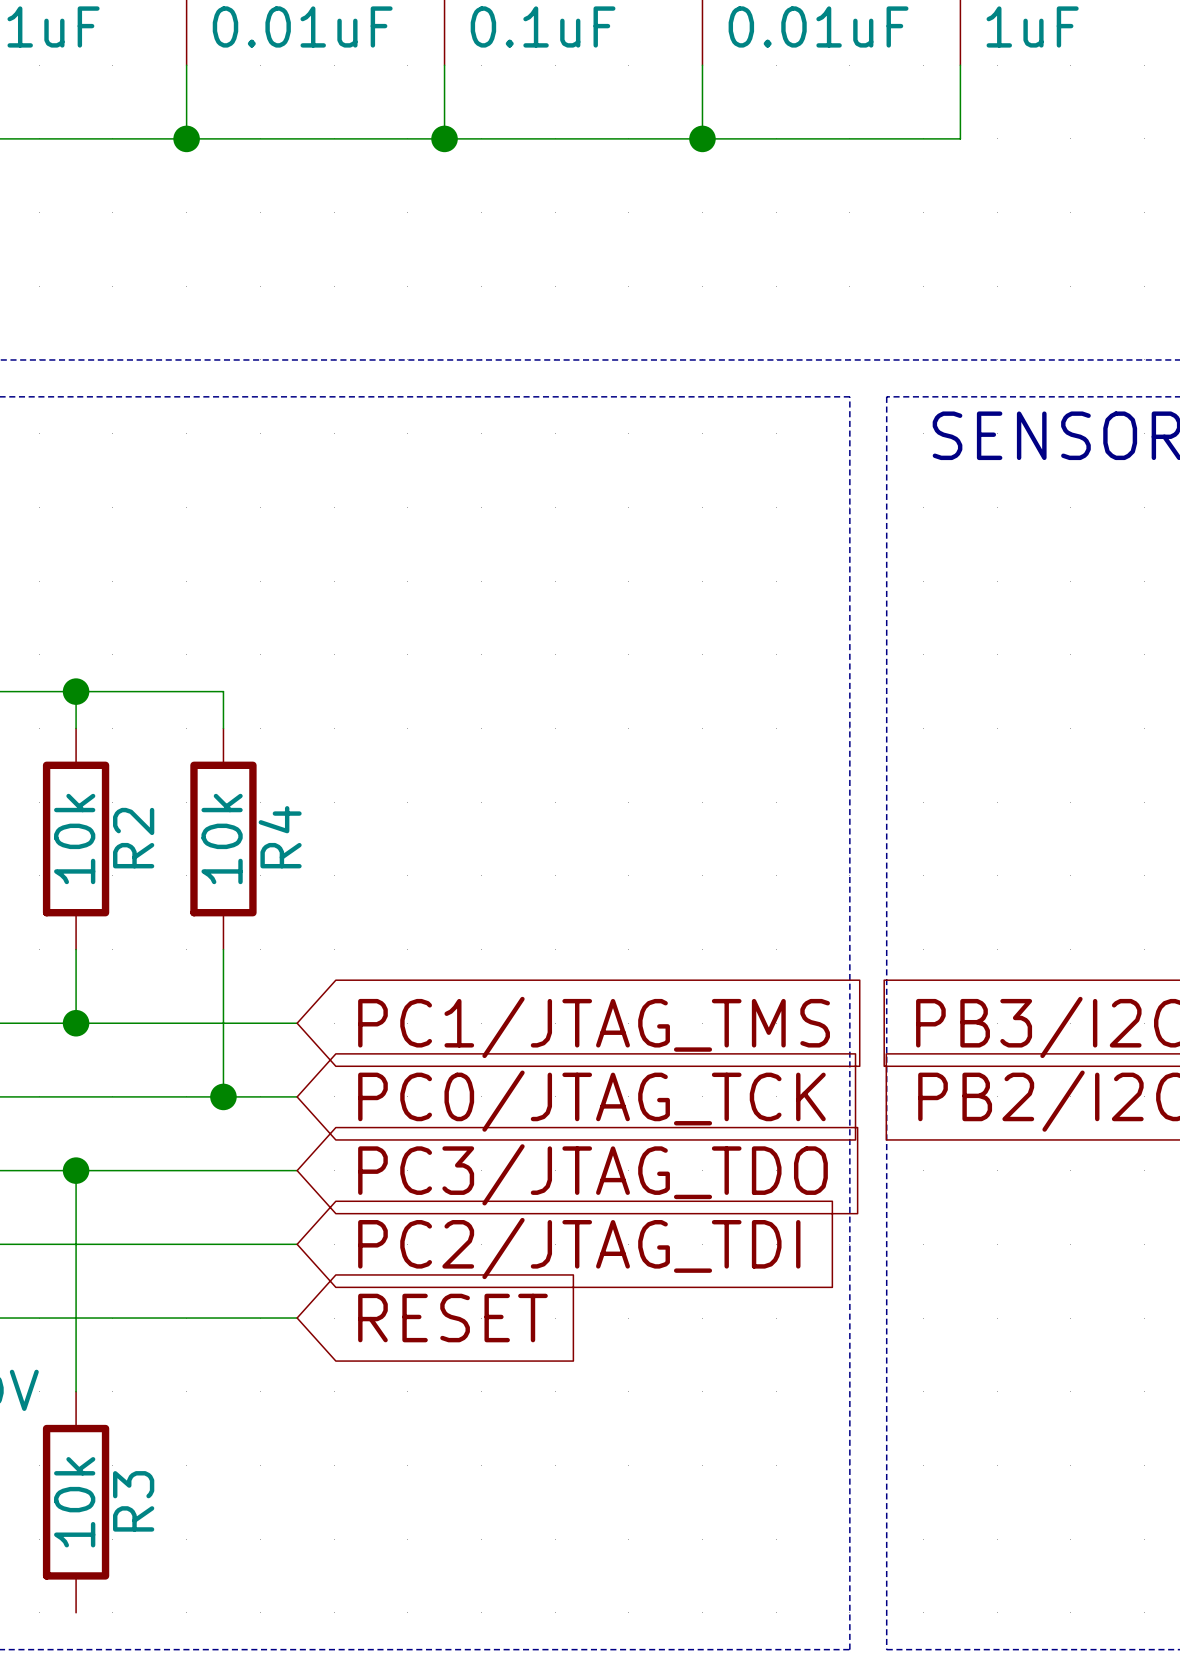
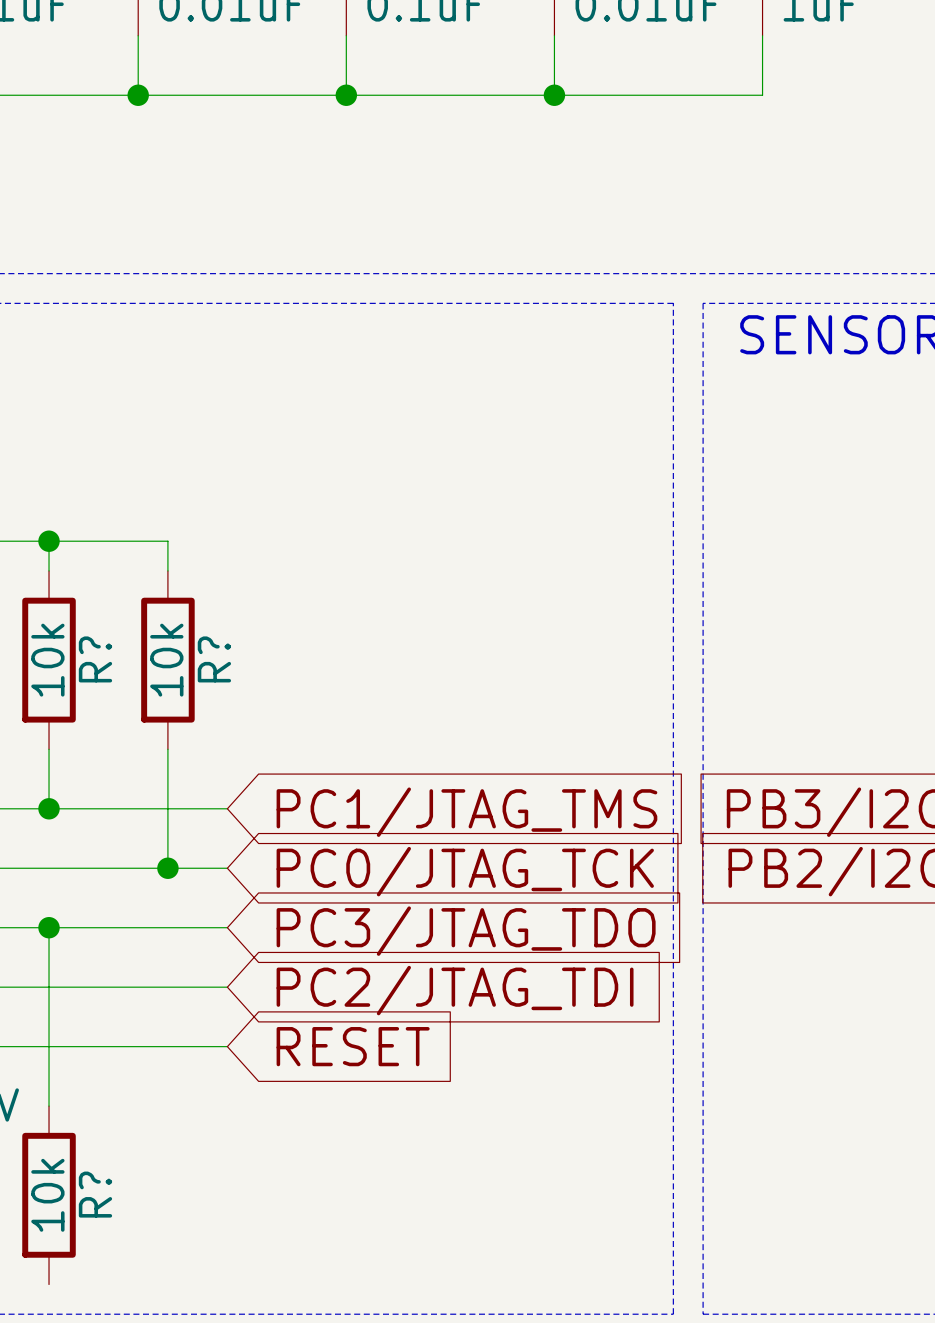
R4 name: R4 (280, 837) -> R? (214, 659)
R2 name: R2 (133, 838) -> R? (95, 659)
R3 name: R3 (133, 1501) -> R? (95, 1194)

